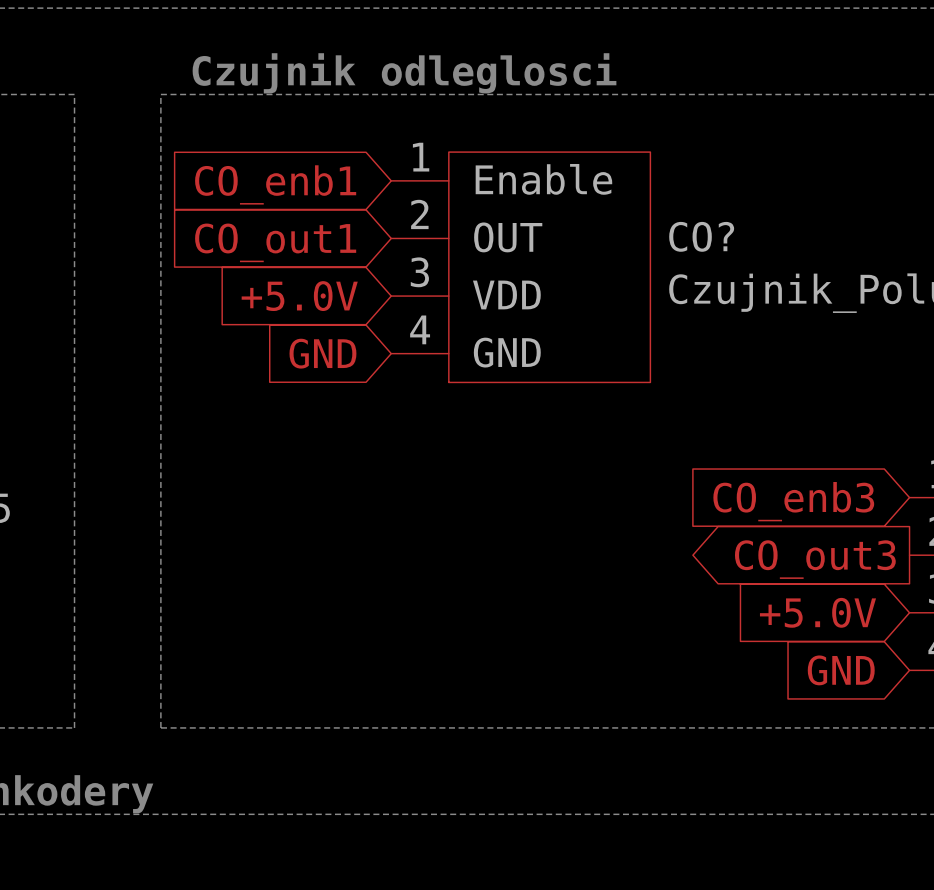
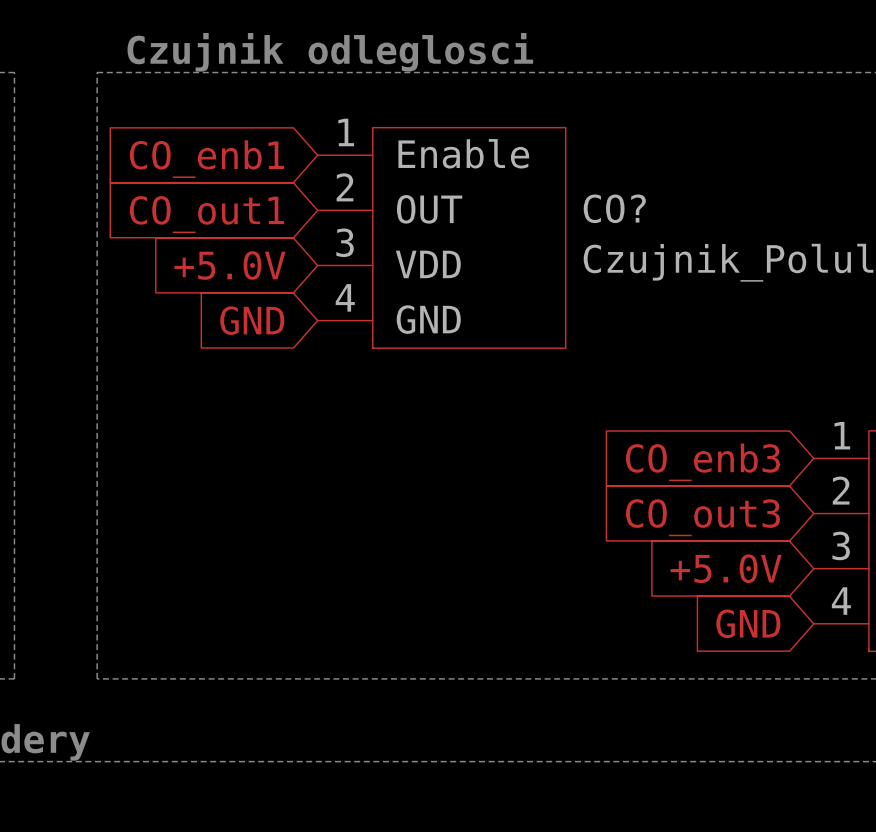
global label shape: output (815, 559) -> input (702, 517)

